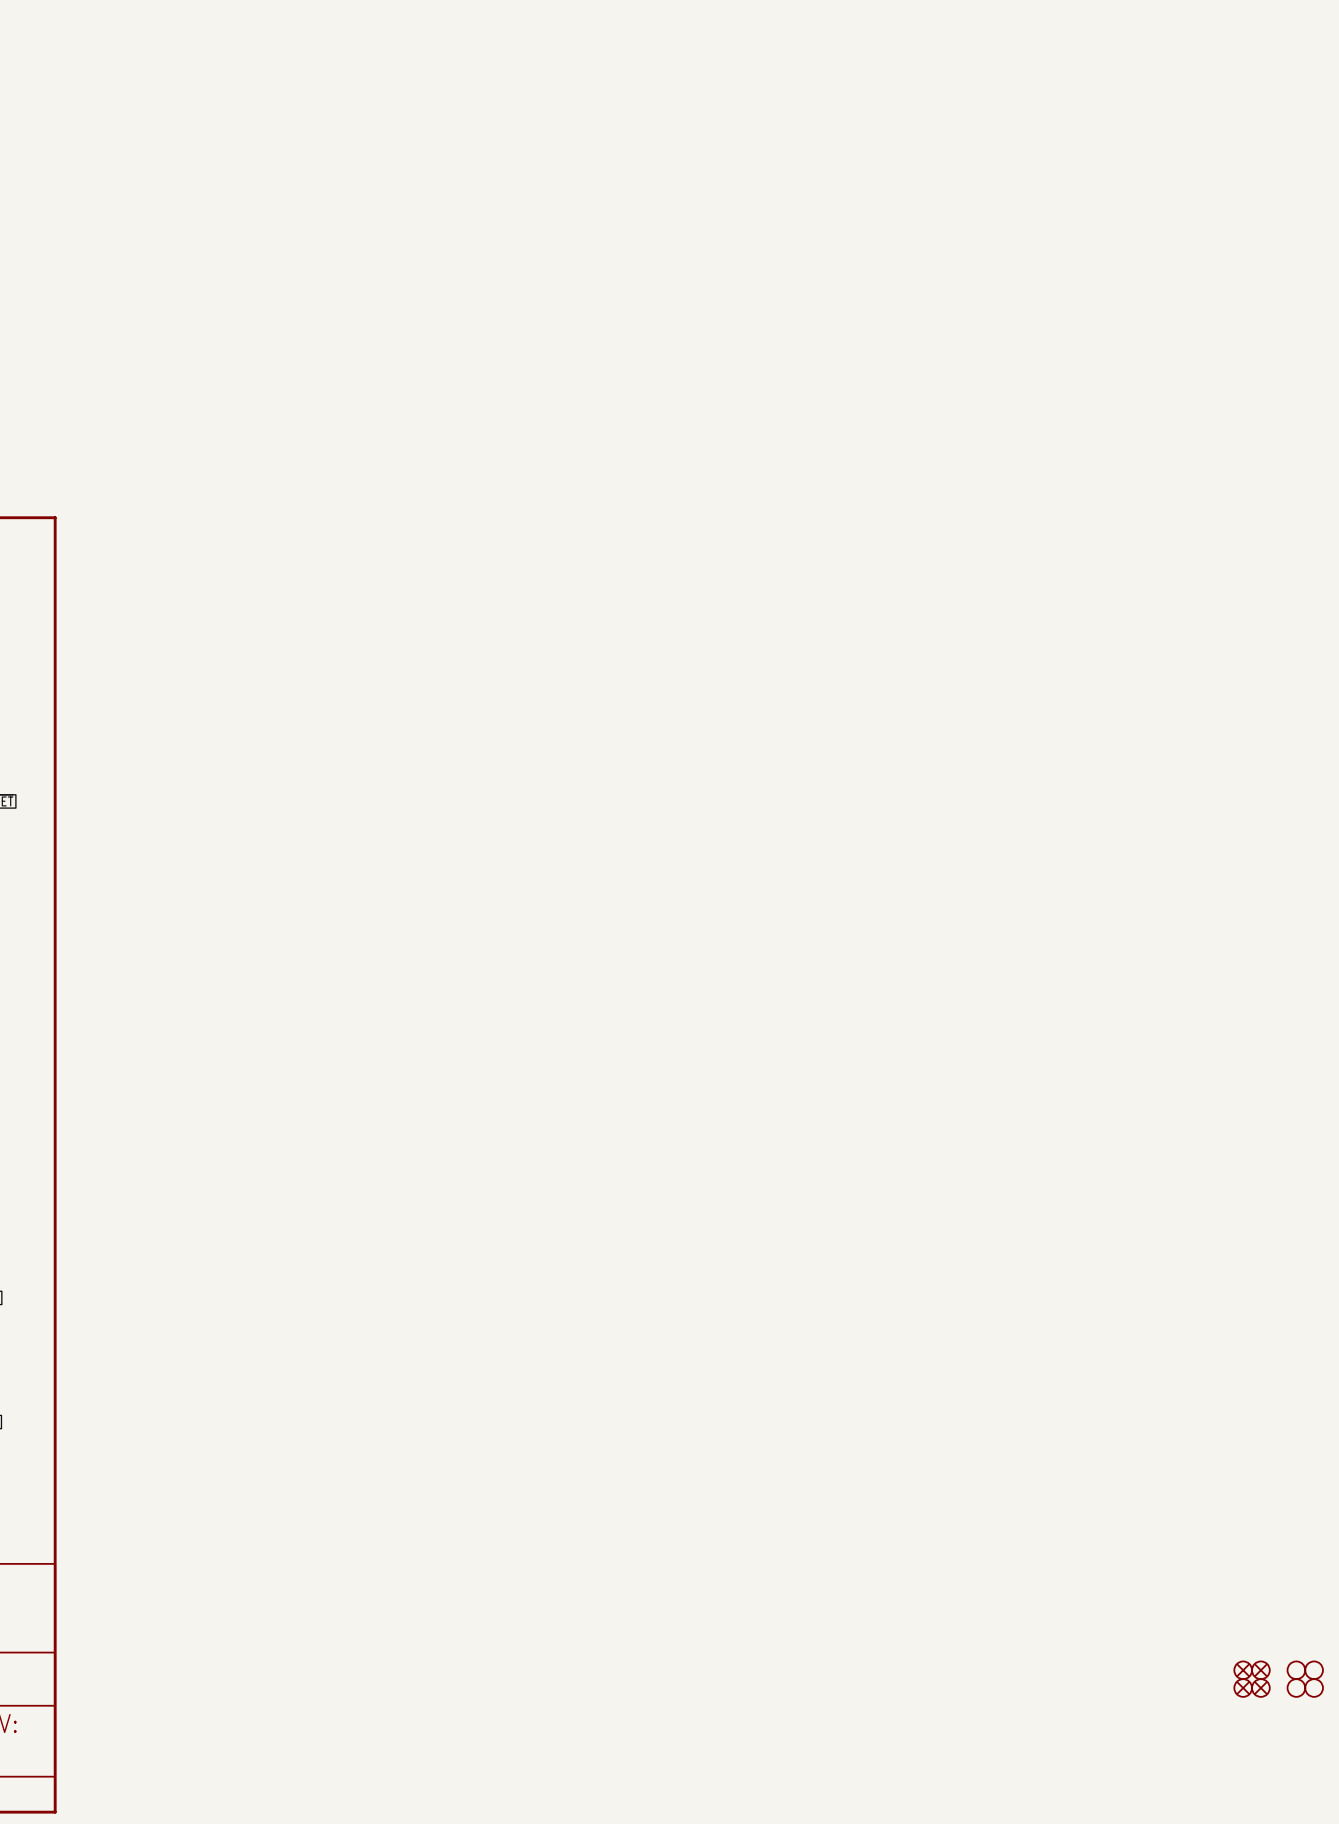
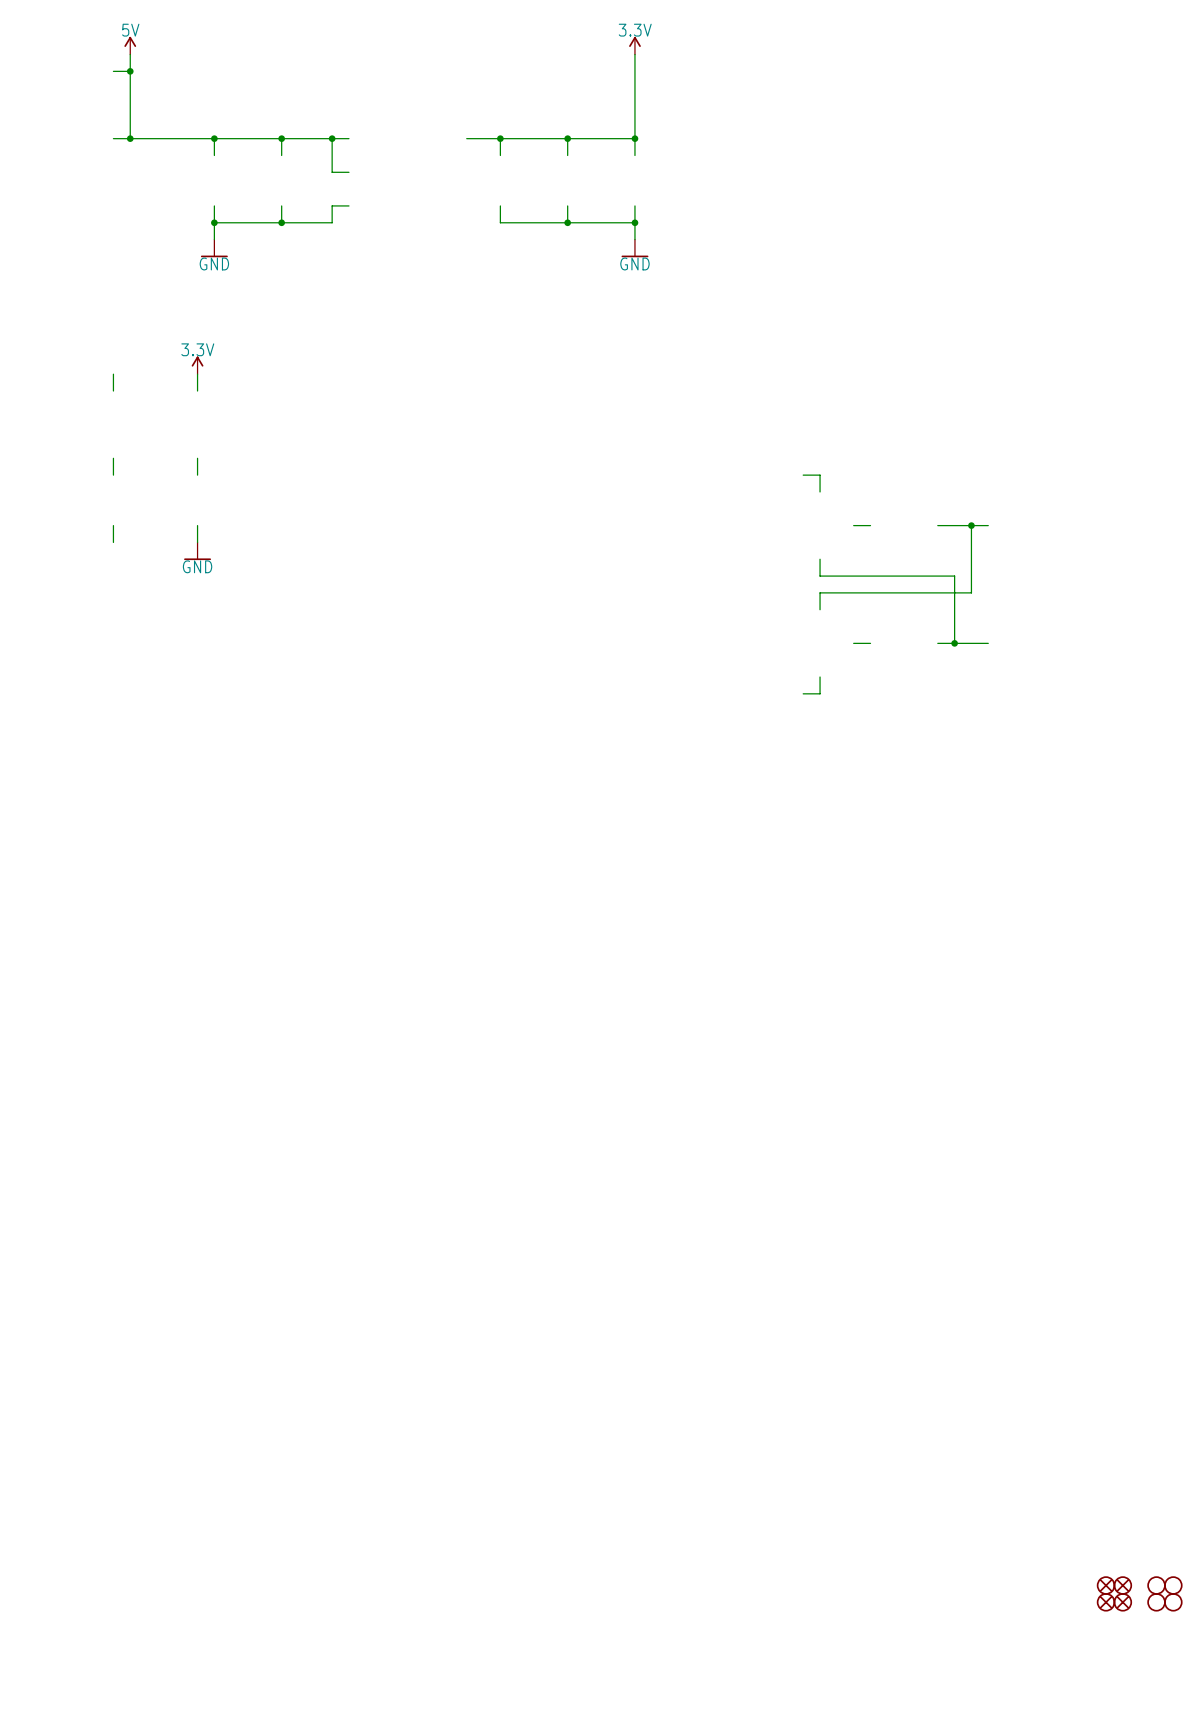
power symbol: none -> 5V (130, 45)
power symbol: none -> 3.3V (634, 45)
wire: none -> (130, 54) (130, 138)
wire: none -> (634, 54) (634, 155)
wire: none -> (113, 71) (130, 71)
junction: none -> (130, 71)
wire: none -> (113, 138) (348, 138)
junction: none -> (130, 138)
wire: none -> (214, 138) (214, 155)
junction: none -> (214, 138)
wire: none -> (281, 138) (281, 155)
junction: none -> (281, 138)
wire: none -> (332, 138) (332, 172) (348, 172)
junction: none -> (332, 138)
wire: none -> (466, 138) (634, 138)
wire: none -> (500, 138) (500, 155)
junction: none -> (500, 138)
wire: none -> (567, 138) (567, 155)
junction: none -> (567, 138)
junction: none -> (634, 138)
wire: none -> (214, 205) (214, 239)
wire: none -> (281, 205) (281, 222)
wire: none -> (348, 205) (332, 205) (332, 222) (214, 222)
wire: none -> (500, 205) (500, 222) (634, 222)
wire: none -> (567, 205) (567, 222)
wire: none -> (634, 205) (634, 239)
junction: none -> (214, 222)
junction: none -> (281, 222)
junction: none -> (567, 222)
junction: none -> (634, 222)
power symbol: none -> GND (214, 248)
power symbol: none -> GND (634, 248)
power symbol: none -> 3.3V (197, 365)
wire: none -> (113, 374) (113, 391)
wire: none -> (197, 374) (197, 391)
wire: none -> (113, 458) (113, 475)
wire: none -> (197, 458) (197, 475)
wire: none -> (803, 475) (820, 475) (820, 491)
wire: none -> (113, 525) (113, 542)
wire: none -> (197, 525) (197, 542)
wire: none -> (853, 525) (870, 525)
wire: none -> (937, 525) (988, 525)
wire: none -> (971, 525) (971, 592) (820, 592) (820, 609)
junction: none -> (971, 525)
power symbol: none -> GND (197, 551)
wire: none -> (820, 559) (820, 576) (954, 576) (954, 643)
wire: none -> (853, 643) (870, 643)
wire: none -> (937, 643) (988, 643)
junction: none -> (954, 643)
wire: none -> (820, 677) (820, 693) (803, 693)

